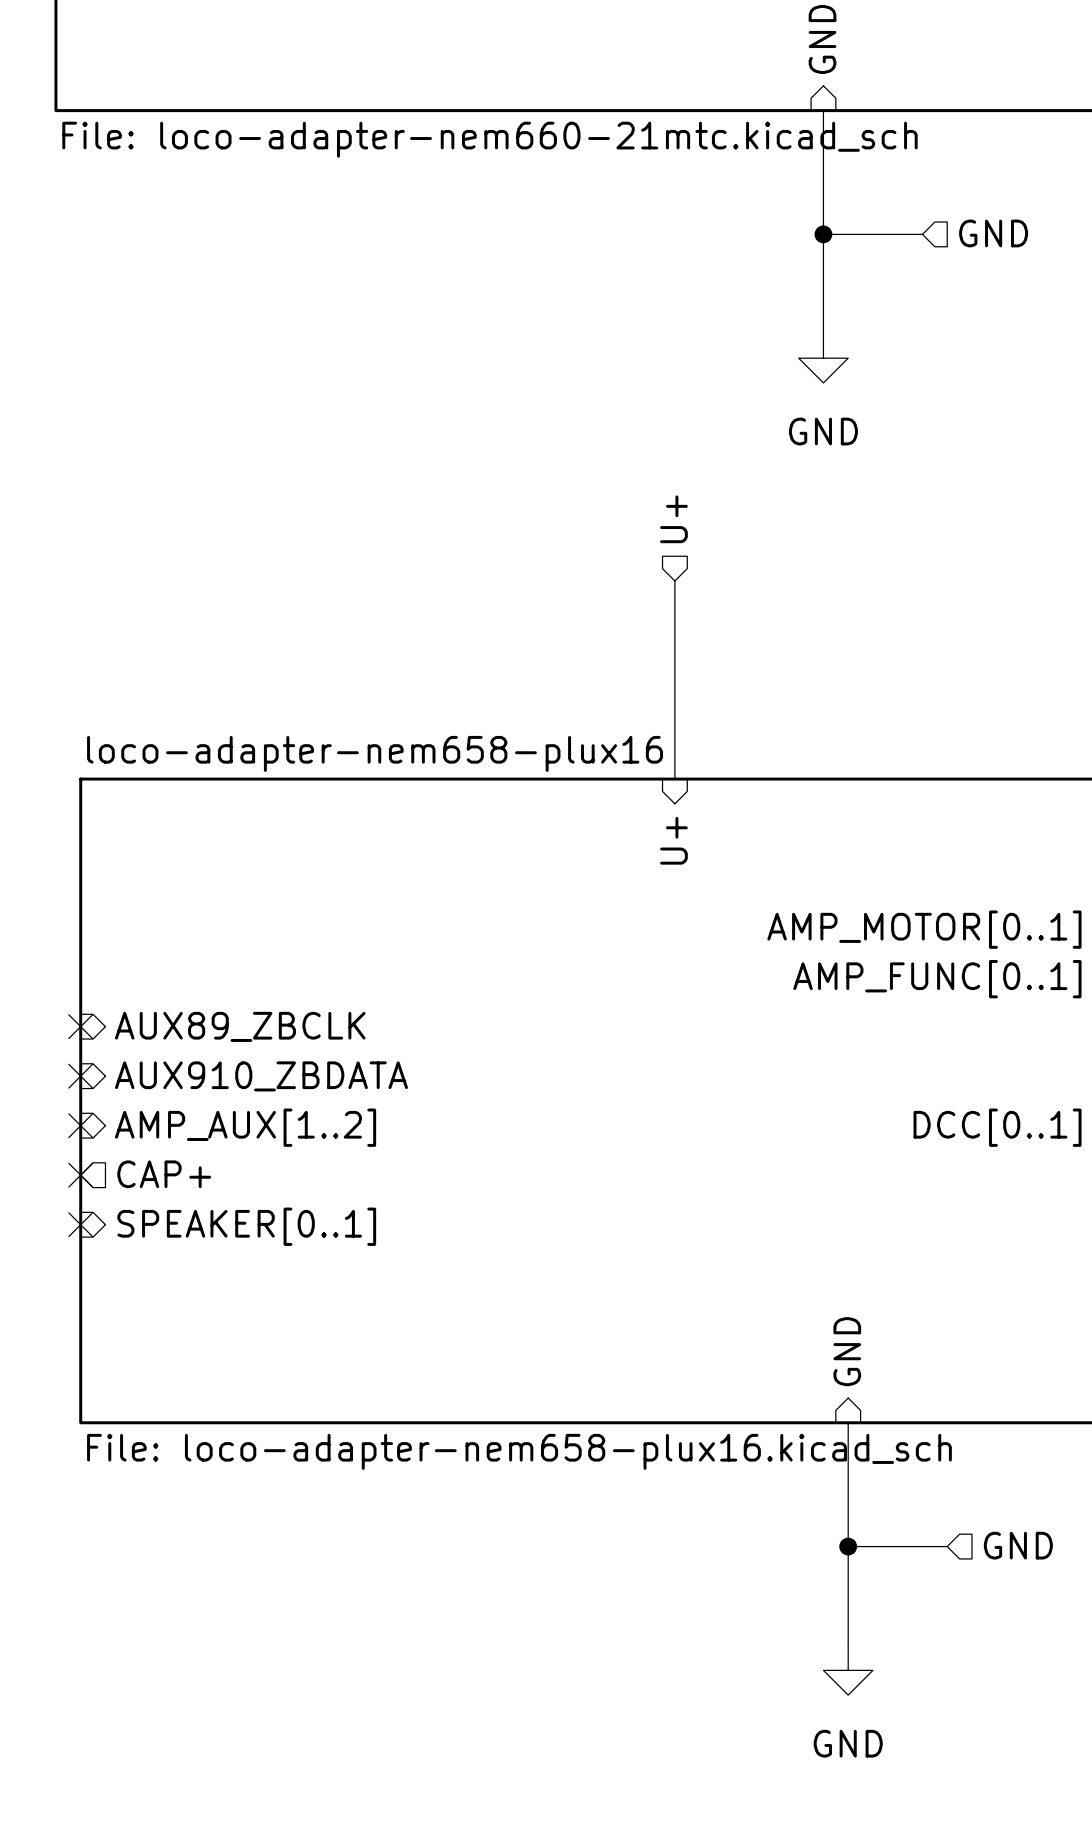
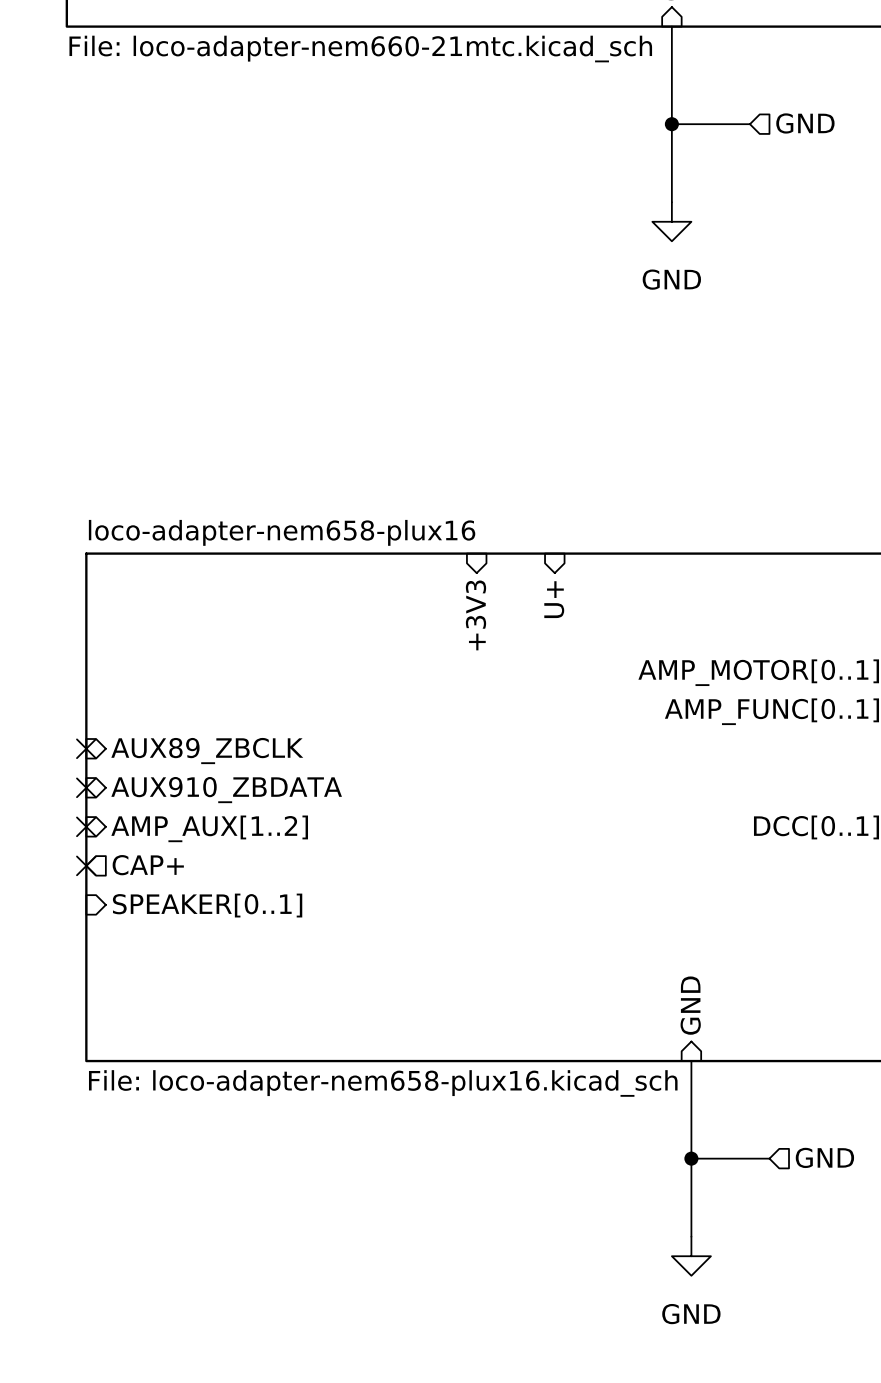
hierarchical label: U+ (673, 519) -> none
wire: (674, 581) (674, 779) -> none
sheet pin: none -> +3V3 (476, 615)
no-connect mark: (80, 1224) -> none

